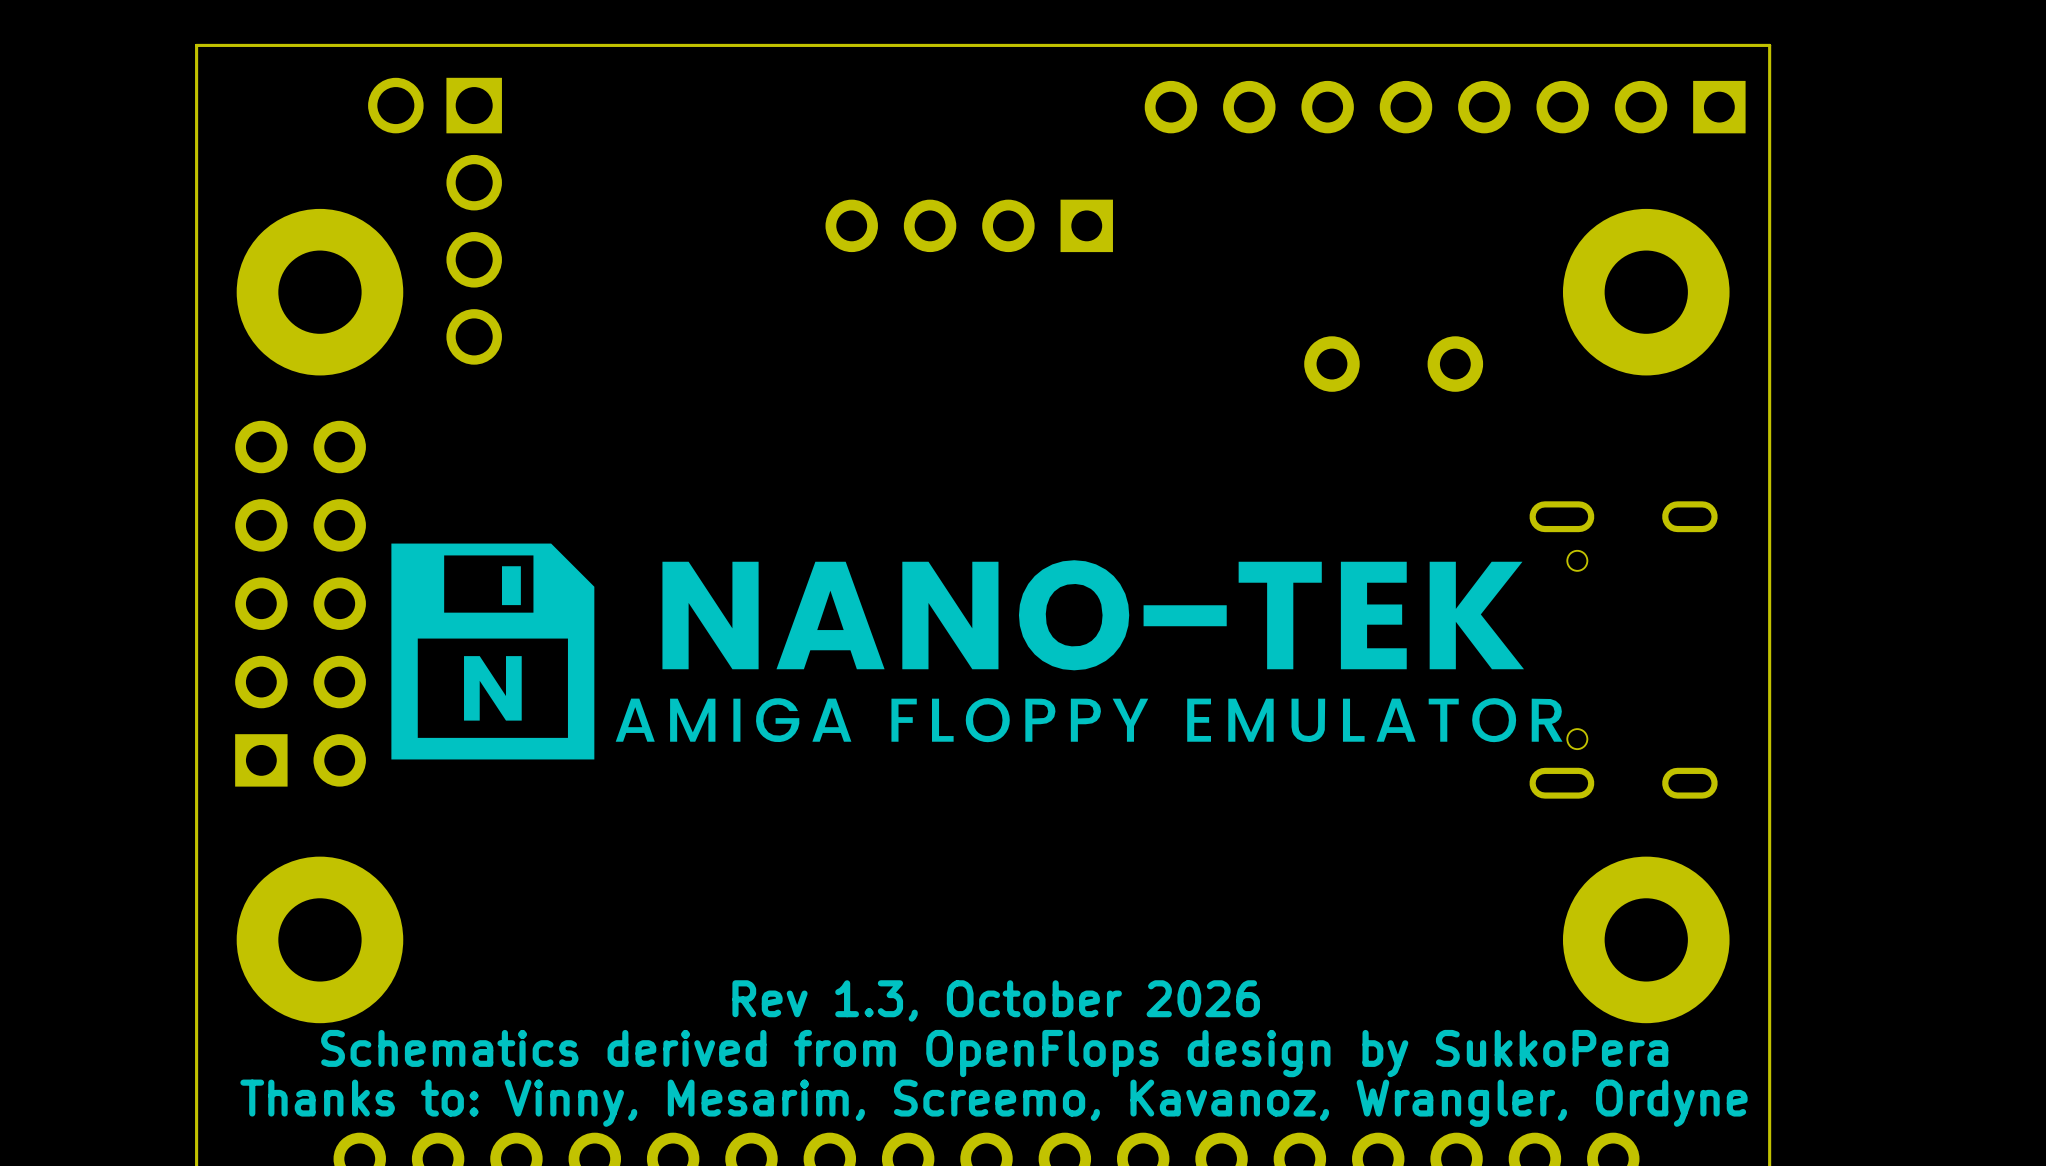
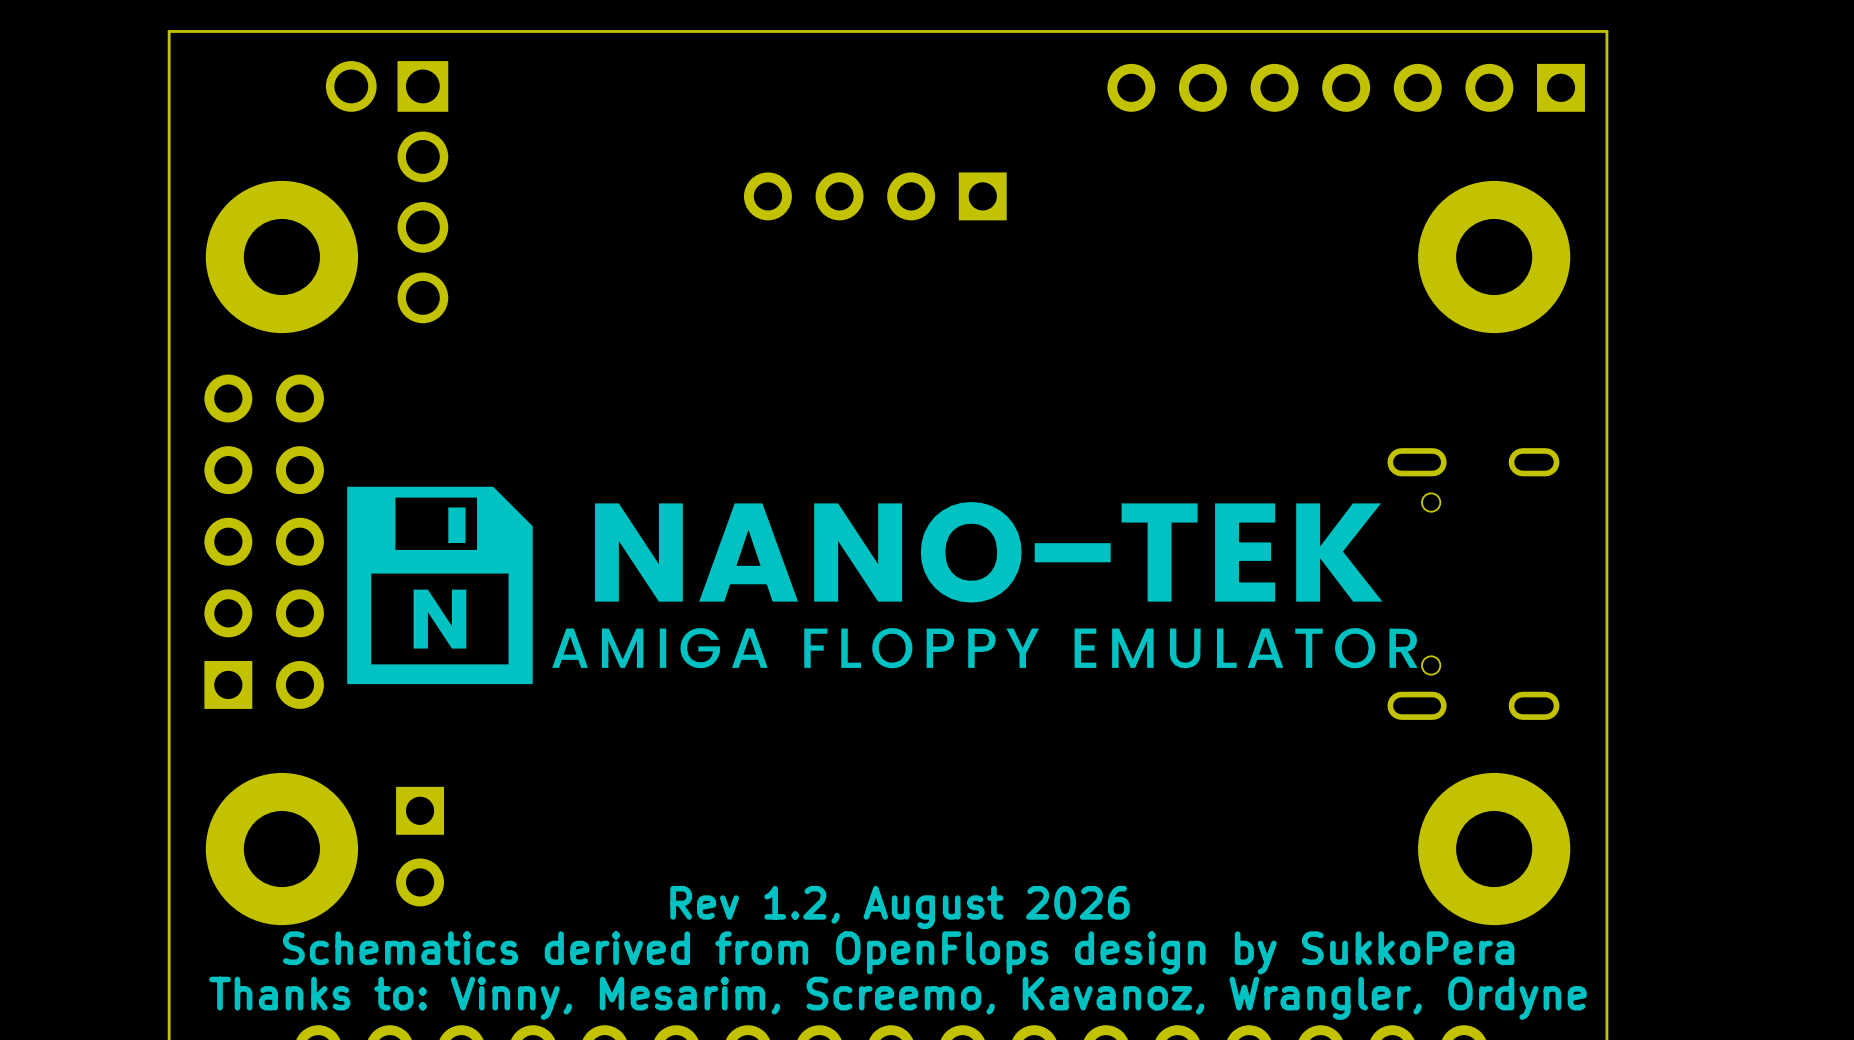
part: (1445, 107) -> none
part: (1393, 364) -> none
part: none -> (420, 846)
text: Rev 1.3, October 2026 (996, 1000) -> Rev 1.2, August 2026 (899, 907)

